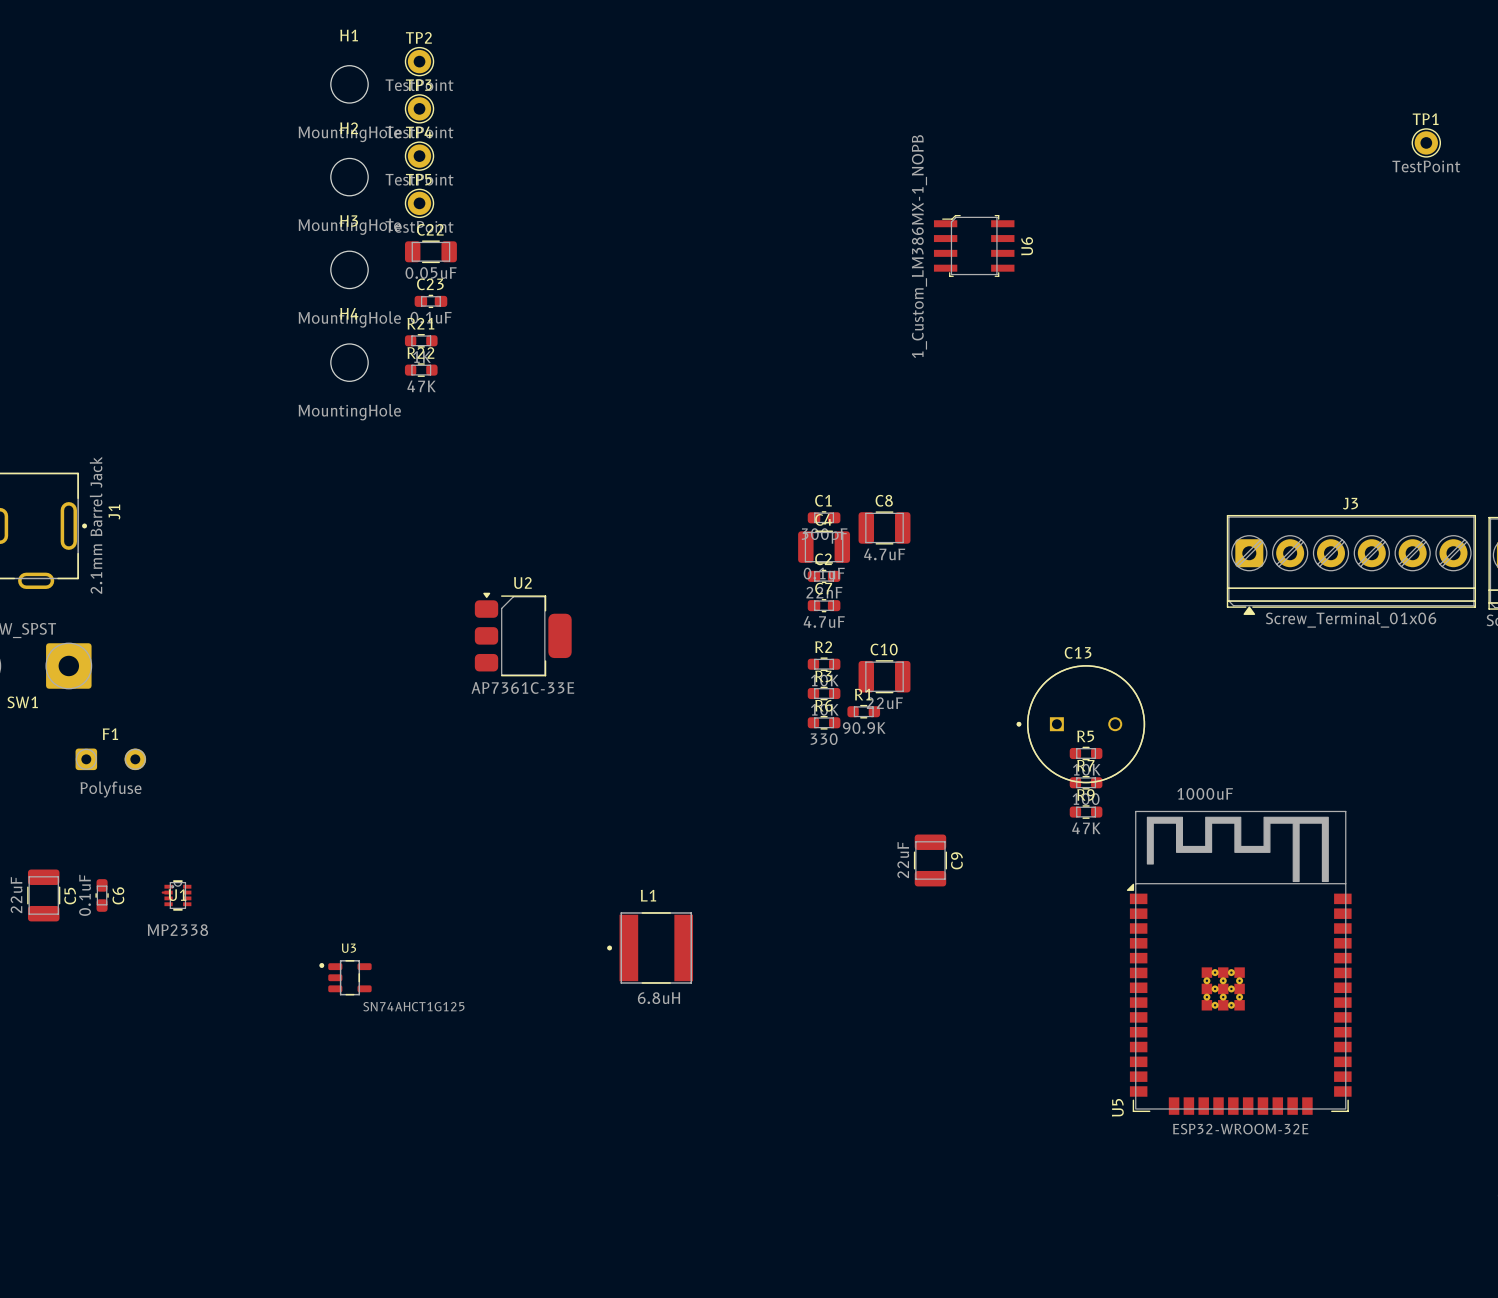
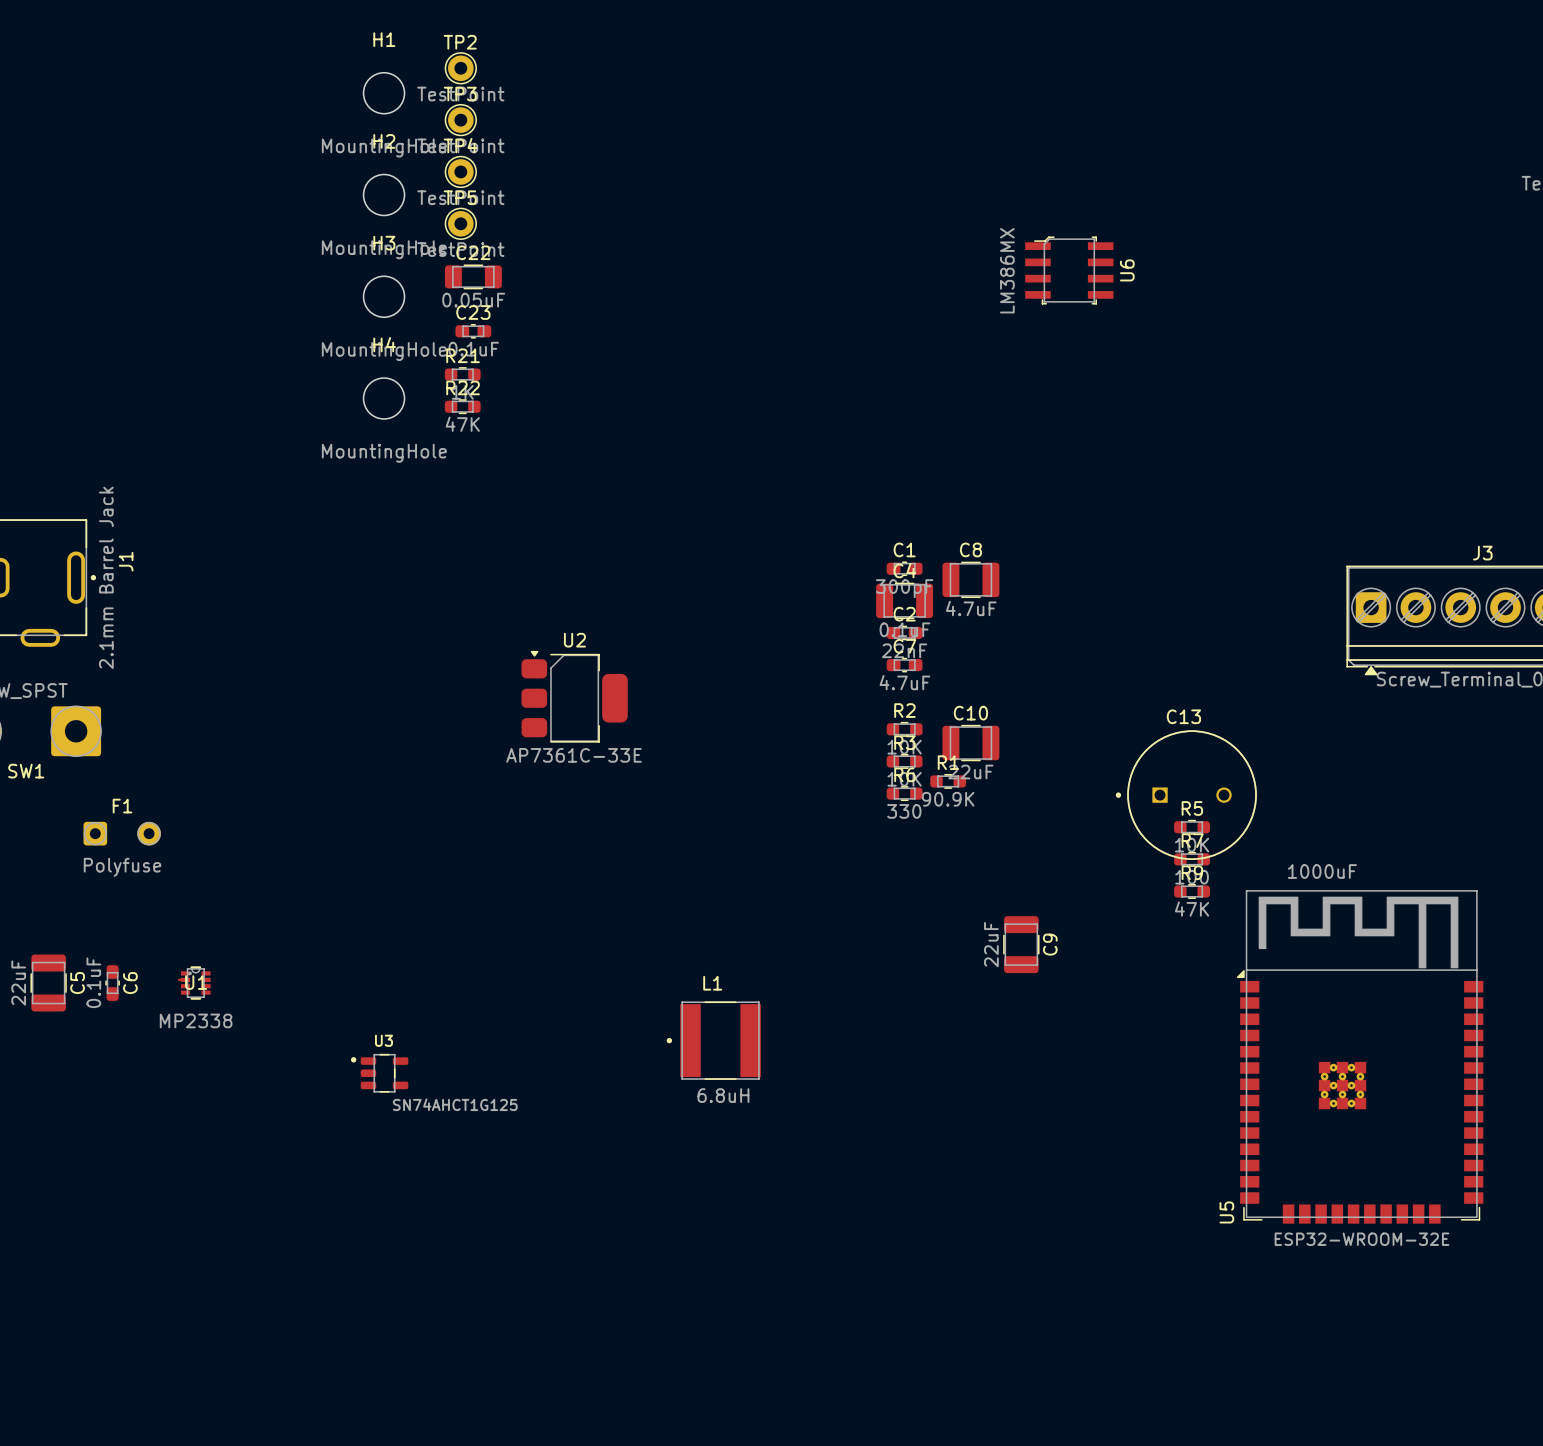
U6 value: 1_Custom_LM386MX-1_NOPB (919, 246) -> LM386MX (1007, 270)

